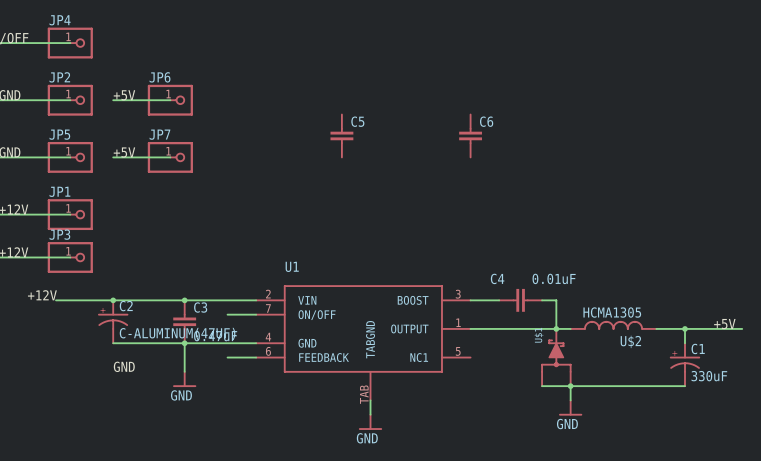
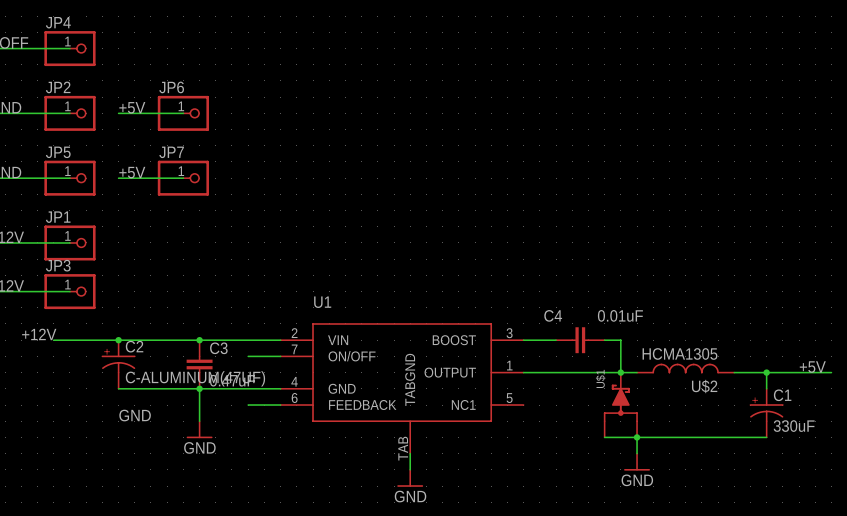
C5: (341, 135) -> none
C6: (470, 135) -> none

